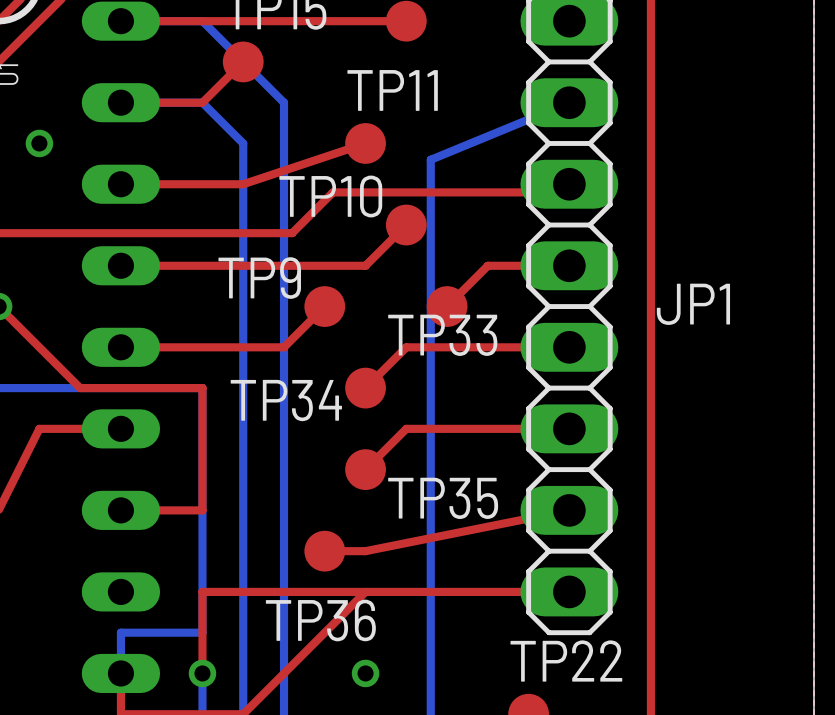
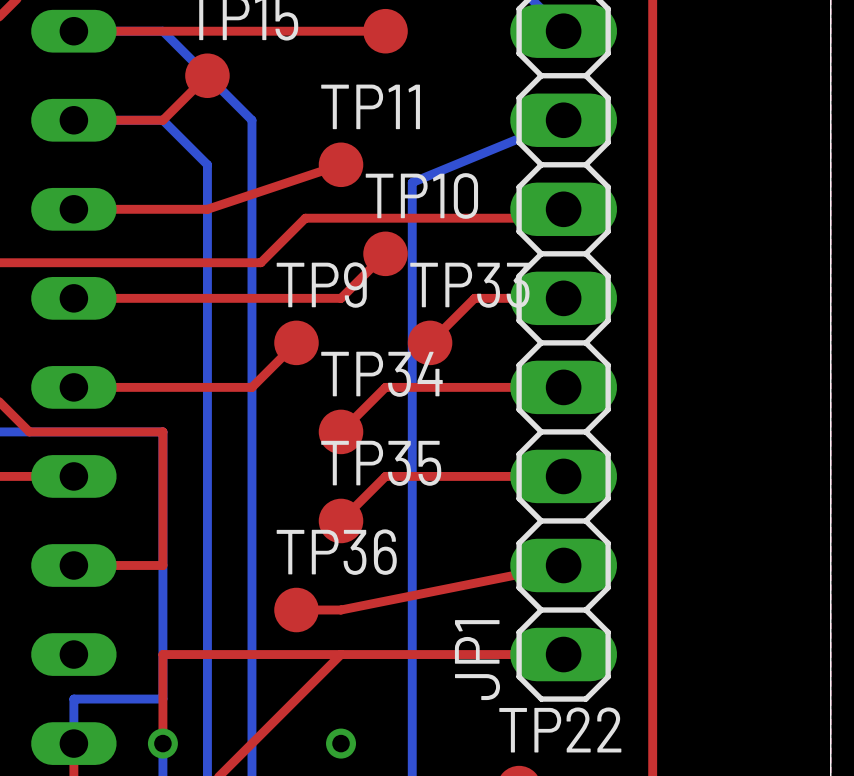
TP10 name position: TP10 (330, 196) -> TP10 (421, 195)
TP9 name position: TP9 (259, 278) -> TP9 (321, 285)
JP1 name rotation: 0° (693, 304) -> 90° counterclockwise (477, 660)
JP1 name position: JP1 (693, 304) -> JP1 (477, 660)
TP33 name position: TP33 (442, 335) -> TP33 (469, 285)
TP34 name position: TP34 (286, 400) -> TP34 (381, 374)
TP35 name position: TP35 (443, 498) -> TP35 (381, 463)
TP36 name position: TP36 (320, 620) -> TP36 (336, 552)

